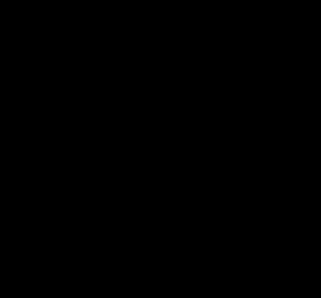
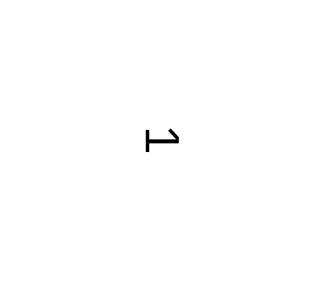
text: none -> 1 (162, 140)

